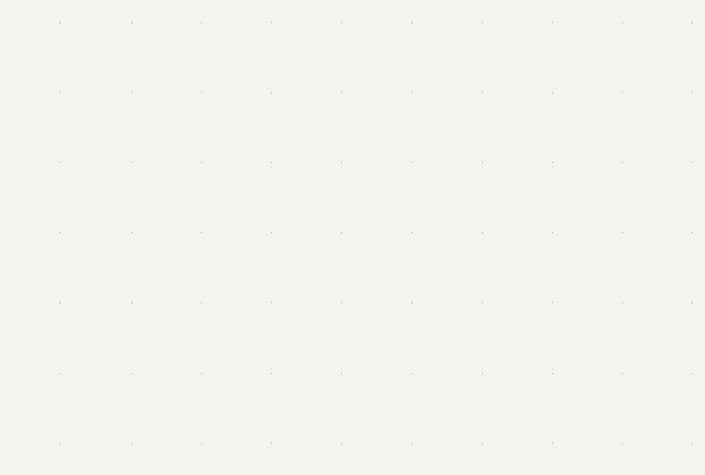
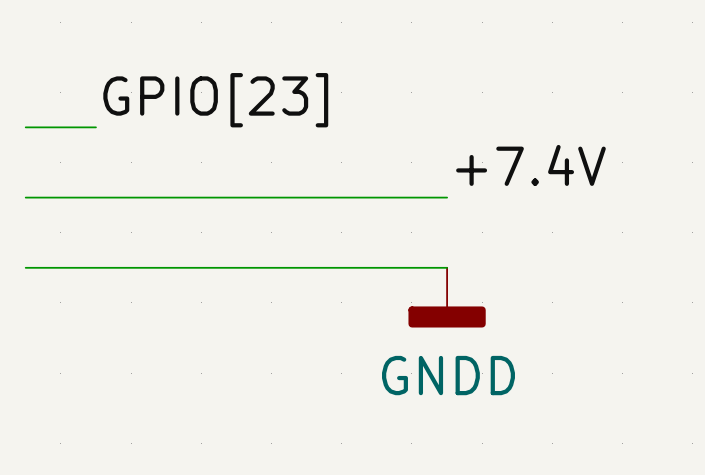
label: none -> GPIO[23] (215, 100)
wire: none -> (25, 127) (95, 127)
label: none -> +7.4V (530, 165)
wire: none -> (25, 197) (447, 197)
wire: none -> (25, 267) (447, 267)
power symbol: none -> GNDD (447, 297)

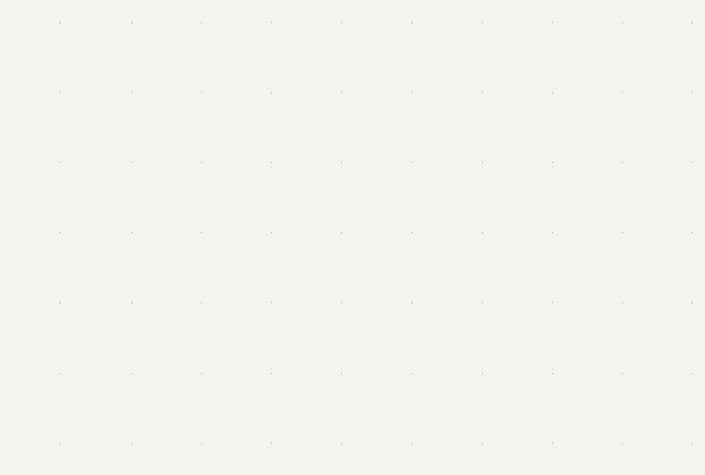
label: GPIO[23] (215, 100) -> none
wire: (25, 127) (95, 127) -> none
label: +7.4V (530, 165) -> none
wire: (25, 197) (447, 197) -> none
wire: (25, 267) (447, 267) -> none
power symbol: GNDD (447, 297) -> none

